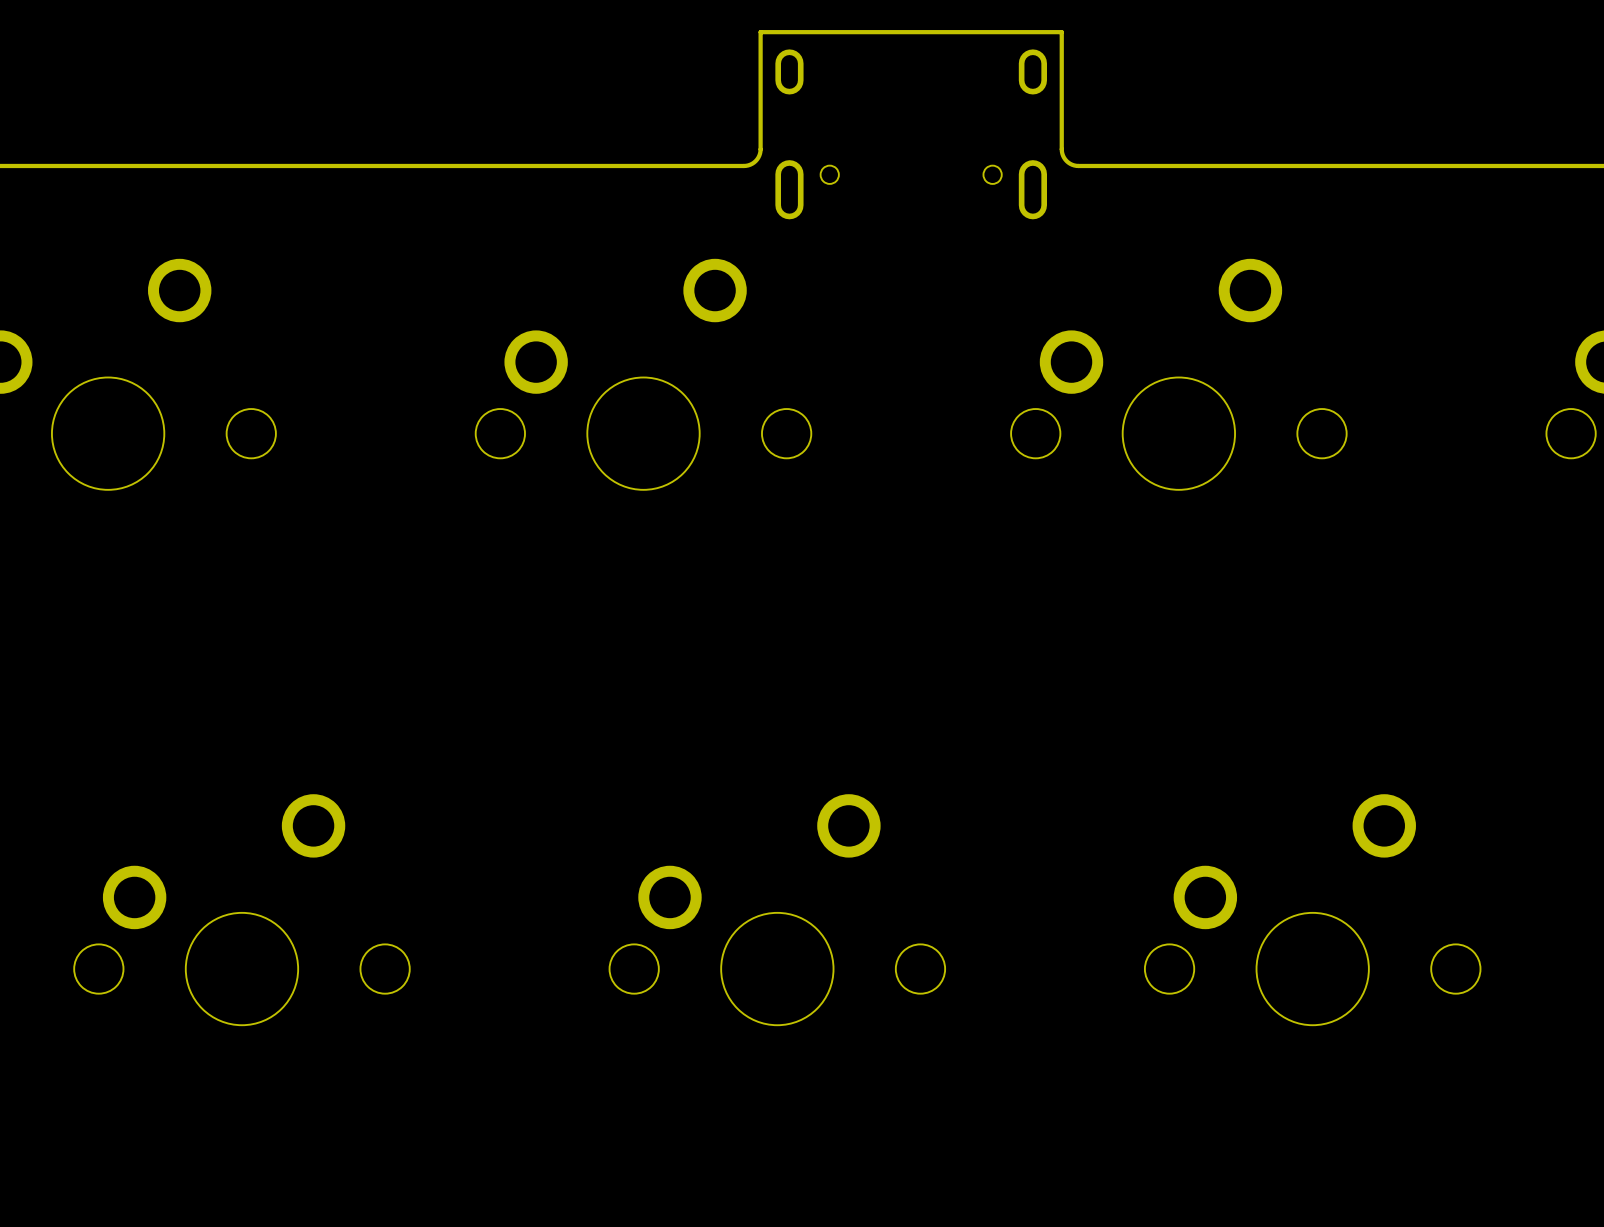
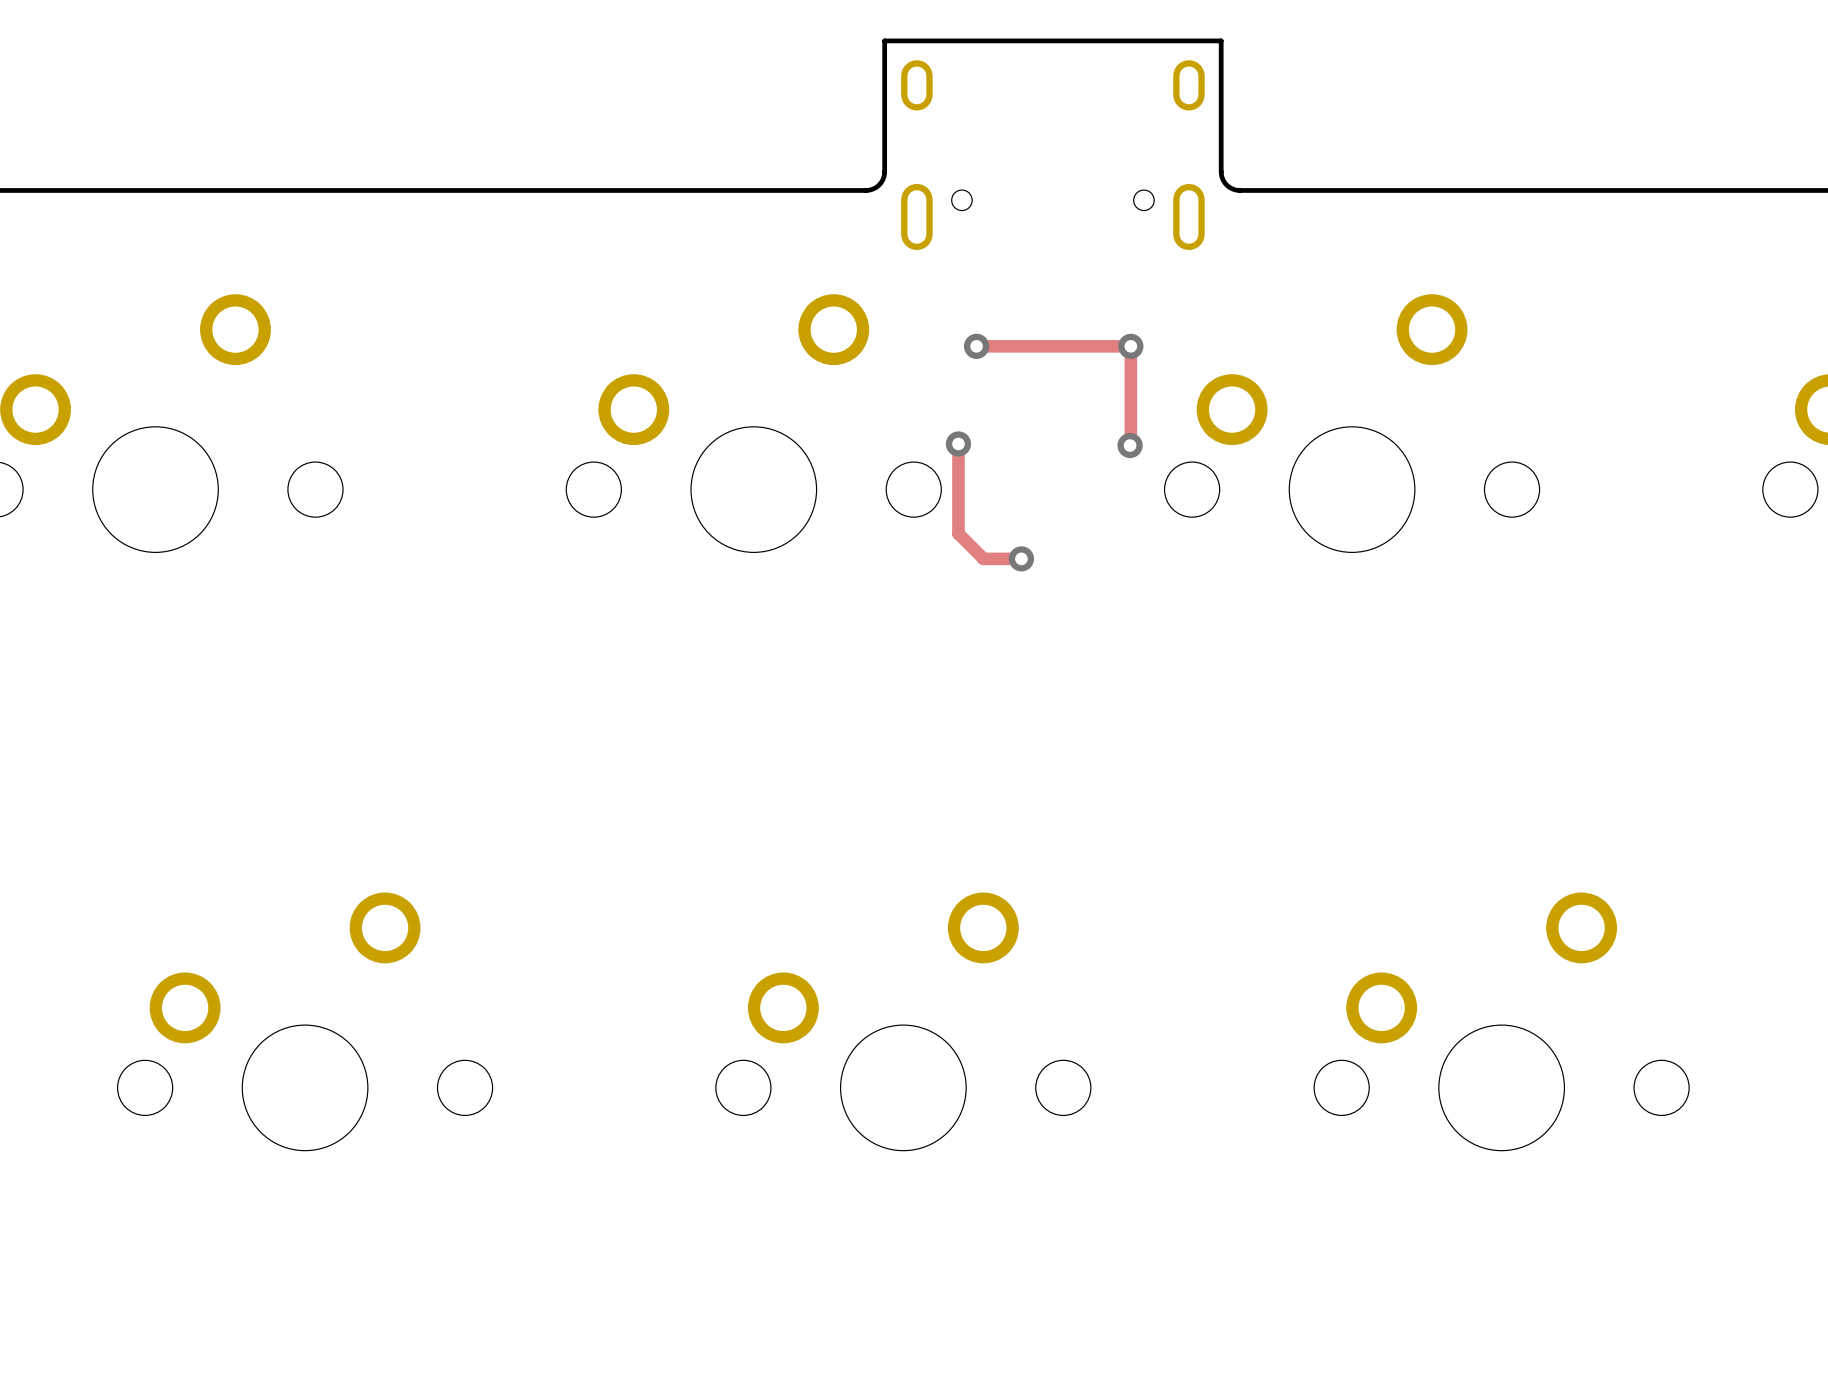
track: none -> (976, 346) (1130, 346) (1130, 445)
via: none -> (976, 346)
via: none -> (1130, 346)
track: none -> (958, 443) (958, 533) (983, 558) (1021, 558)
via: none -> (958, 443)
via: none -> (1130, 445)
via: none -> (1021, 558)

